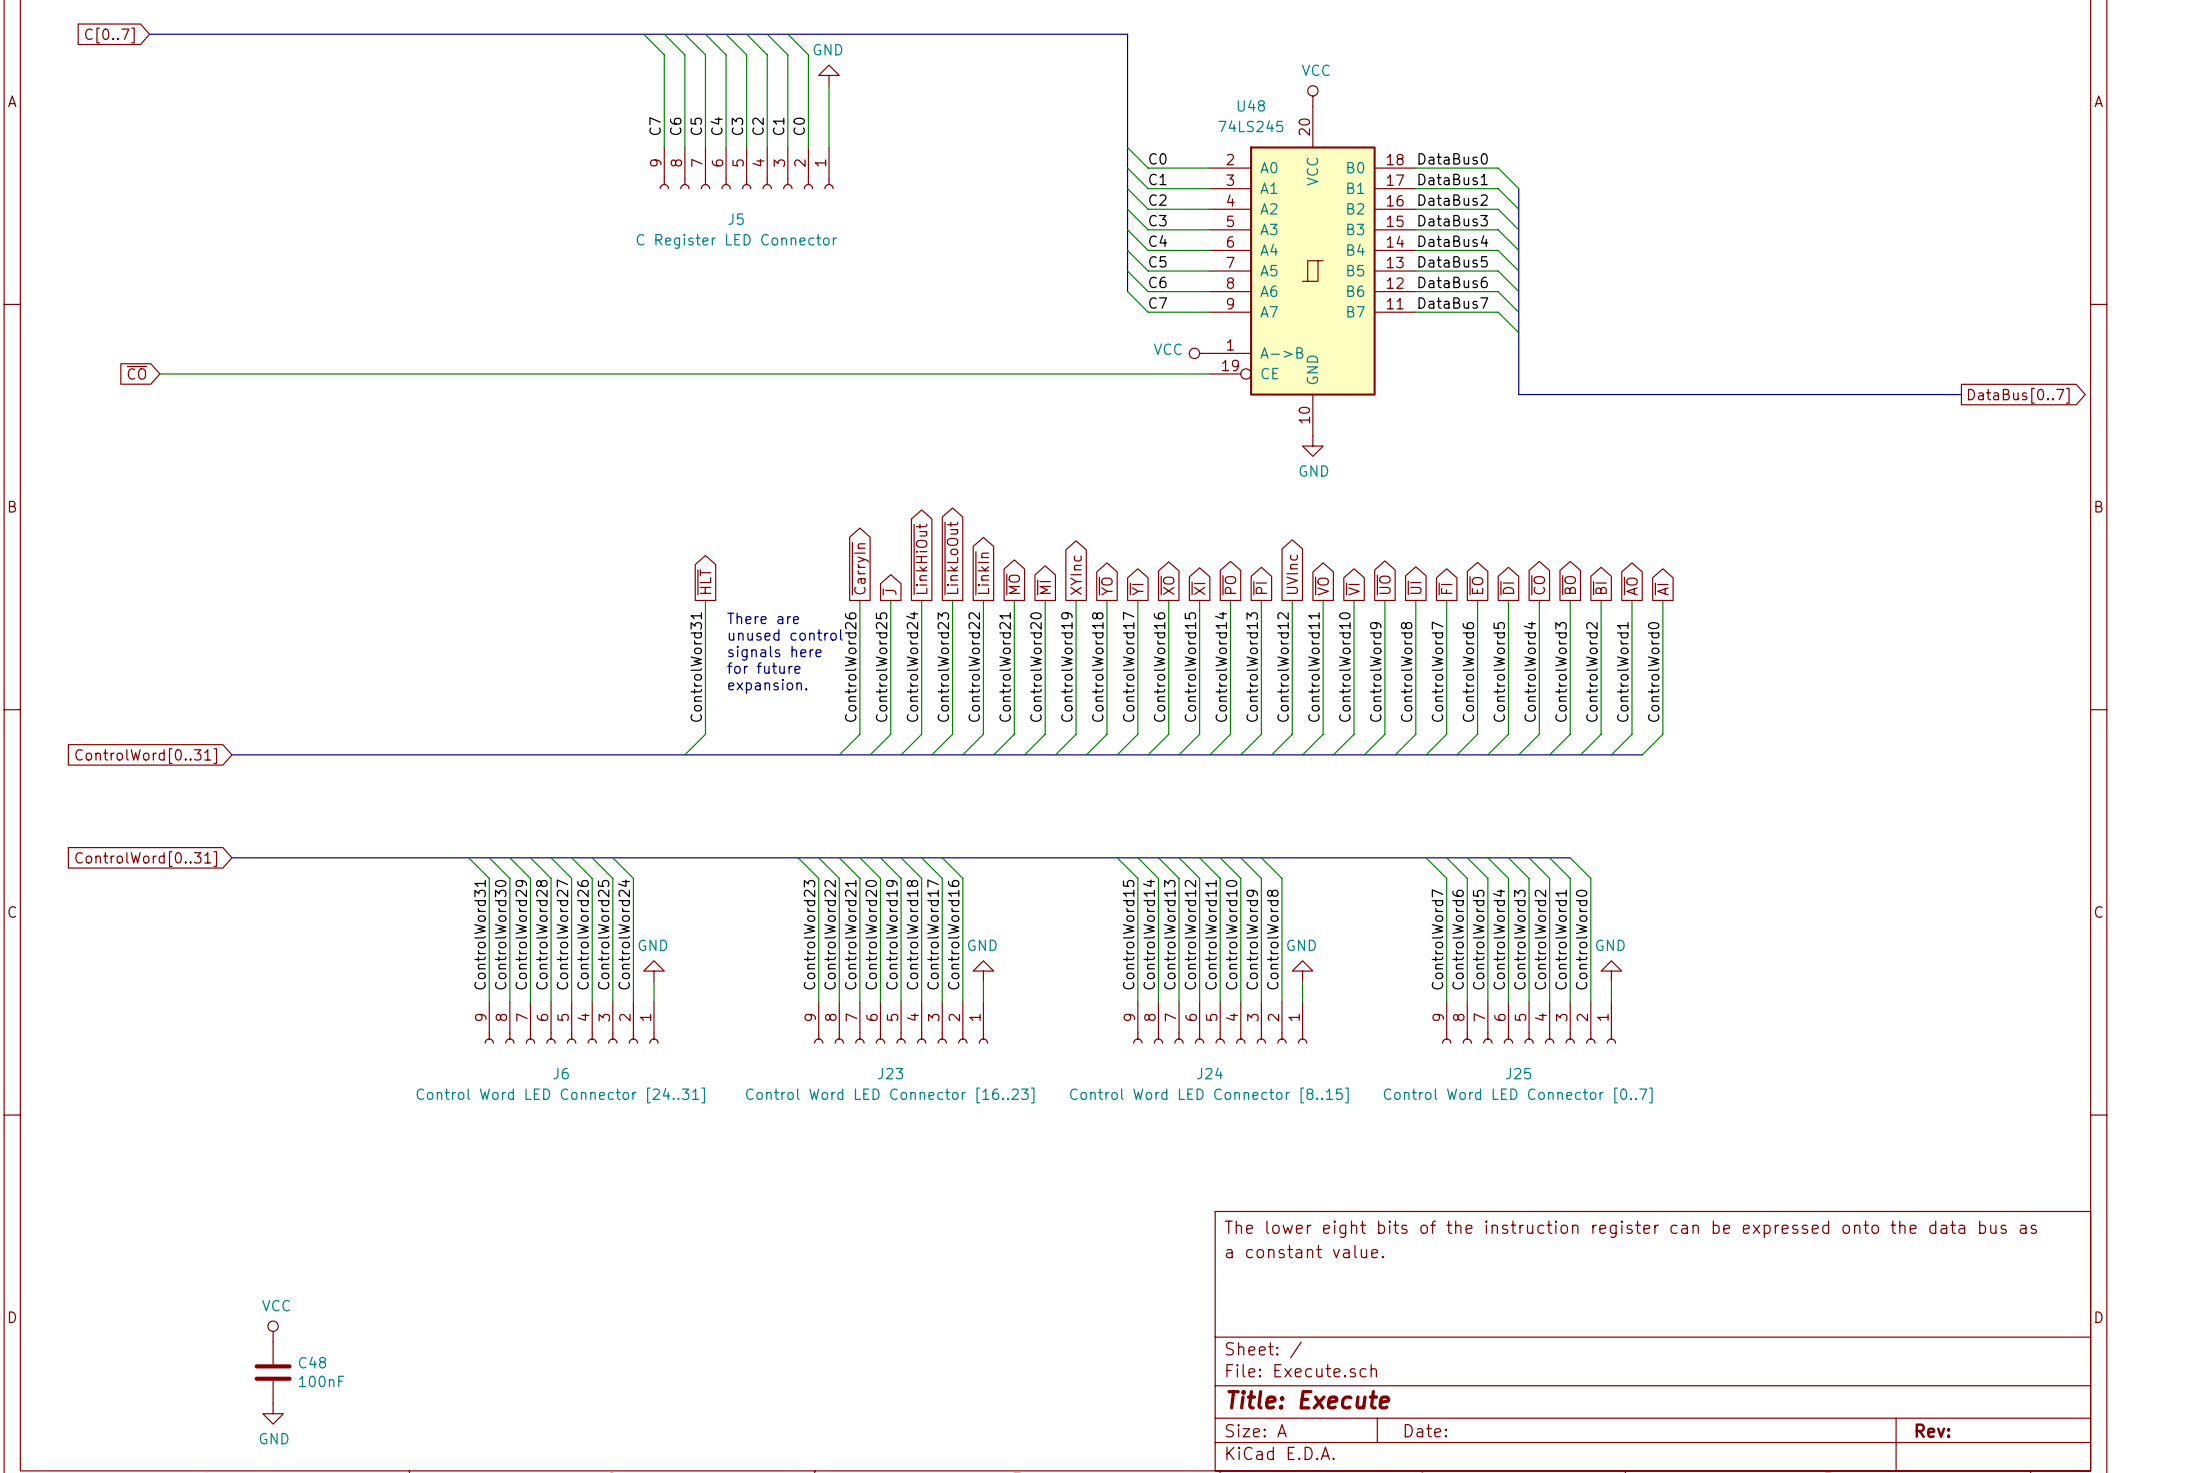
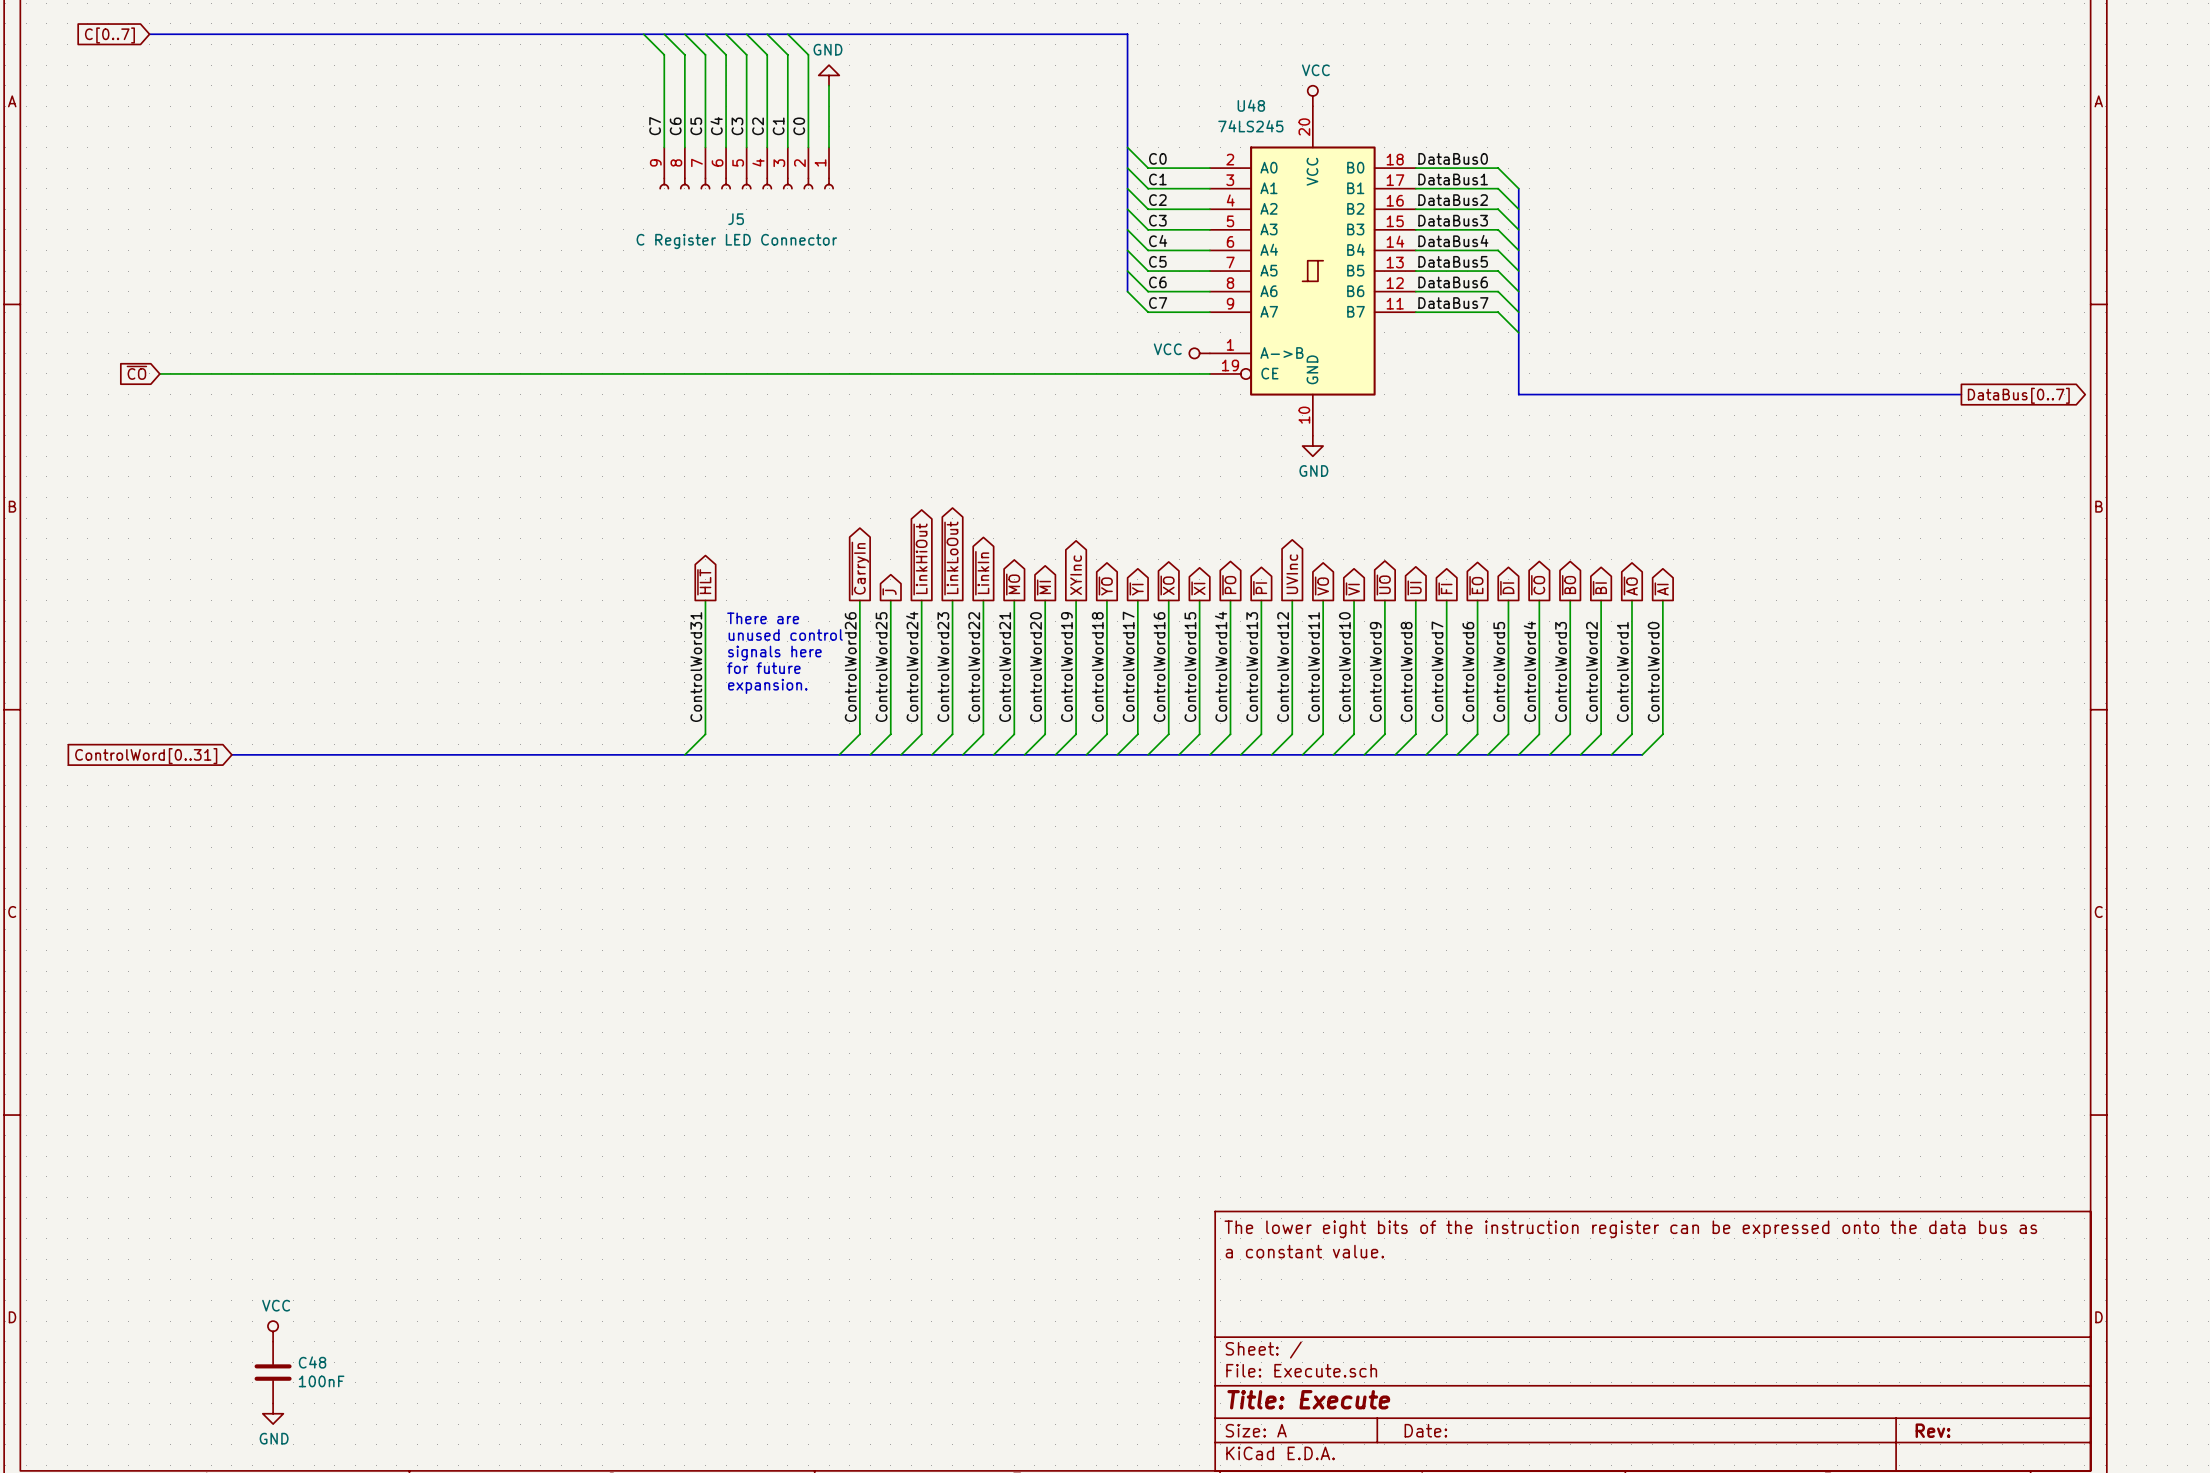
bus: (231, 857) (1570, 857) -> none
wire: (468, 857) (489, 878) (489, 1001) -> none
wire: (489, 857) (509, 878) (509, 1001) -> none
wire: (509, 857) (530, 878) (530, 1001) -> none
wire: (530, 857) (551, 878) (551, 1001) -> none
wire: (551, 857) (571, 878) (571, 1001) -> none
wire: (571, 857) (592, 878) (592, 1001) -> none
wire: (592, 857) (612, 878) (612, 1001) -> none
wire: (612, 857) (633, 878) (633, 1001) -> none
wire: (798, 857) (818, 878) (818, 1001) -> none
wire: (818, 857) (839, 878) (839, 1001) -> none
wire: (839, 857) (859, 878) (859, 1001) -> none
wire: (859, 857) (880, 878) (880, 1001) -> none
wire: (880, 857) (901, 878) (901, 1001) -> none
wire: (901, 857) (921, 878) (921, 1001) -> none
wire: (921, 857) (942, 878) (942, 1001) -> none
wire: (942, 857) (962, 878) (962, 1001) -> none
wire: (1117, 857) (1137, 878) (1137, 1001) -> none
wire: (1137, 857) (1158, 878) (1158, 1001) -> none
wire: (1158, 857) (1179, 878) (1179, 1001) -> none
wire: (1179, 857) (1199, 878) (1199, 1001) -> none
wire: (1199, 857) (1220, 878) (1220, 1001) -> none
wire: (1220, 857) (1240, 878) (1240, 1001) -> none
wire: (1240, 857) (1261, 878) (1261, 1001) -> none
wire: (1261, 857) (1281, 878) (1281, 1001) -> none
wire: (1426, 857) (1446, 878) (1446, 1001) -> none
wire: (1446, 857) (1467, 878) (1467, 1001) -> none
wire: (1467, 857) (1487, 878) (1487, 1001) -> none
wire: (1487, 857) (1508, 878) (1508, 1001) -> none
wire: (1508, 857) (1529, 878) (1529, 1001) -> none
wire: (1529, 857) (1549, 878) (1549, 1001) -> none
wire: (1549, 857) (1570, 878) (1570, 1001) -> none
wire: (1570, 857) (1590, 878) (1590, 1001) -> none
global label: ControlWord[0..31] (146, 859) -> none
label: ControlWord31 (480, 934) -> none
label: ControlWord30 (500, 934) -> none
label: ControlWord29 (521, 934) -> none
label: ControlWord28 (541, 934) -> none
label: ControlWord27 (562, 934) -> none
label: ControlWord26 (583, 934) -> none
label: ControlWord25 (603, 934) -> none
label: ControlWord24 (623, 934) -> none
label: ControlWord23 (809, 934) -> none
label: ControlWord22 (830, 934) -> none
label: ControlWord21 (850, 934) -> none
label: ControlWord20 (871, 934) -> none
label: ControlWord19 (891, 934) -> none
label: ControlWord18 (912, 934) -> none
label: ControlWord17 (933, 934) -> none
label: ControlWord16 (953, 934) -> none
label: ControlWord15 (1128, 934) -> none
label: ControlWord14 (1149, 934) -> none
label: ControlWord13 (1169, 934) -> none
label: ControlWord12 (1190, 934) -> none
label: ControlWord11 (1211, 934) -> none
label: ControlWord10 (1231, 934) -> none
label: ControlWord9 (1252, 939) -> none
label: ControlWord8 (1272, 939) -> none
label: ControlWord7 (1437, 939) -> none
label: ControlWord6 (1458, 939) -> none
label: ControlWord5 (1478, 939) -> none
label: ControlWord4 (1499, 939) -> none
label: ControlWord3 (1519, 939) -> none
label: ControlWord2 (1540, 939) -> none
label: ControlWord1 (1561, 939) -> none
label: ControlWord0 (1581, 939) -> none
power symbol: GND (653, 971) -> none
power symbol: GND (983, 971) -> none
power symbol: GND (1302, 971) -> none
power symbol: GND (1611, 971) -> none
wire: (653, 981) (653, 1001) -> none
wire: (983, 981) (983, 1001) -> none
wire: (1302, 981) (1302, 1001) -> none
wire: (1611, 981) (1611, 1001) -> none
J6: Control Word LED Connector [24..31] (571, 1022) -> none
J23: Control Word LED Connector [16..23] (901, 1022) -> none
J24: Control Word LED Connector [8..15] (1220, 1022) -> none
J25: Control Word LED Connector [0..7] (1529, 1022) -> none

